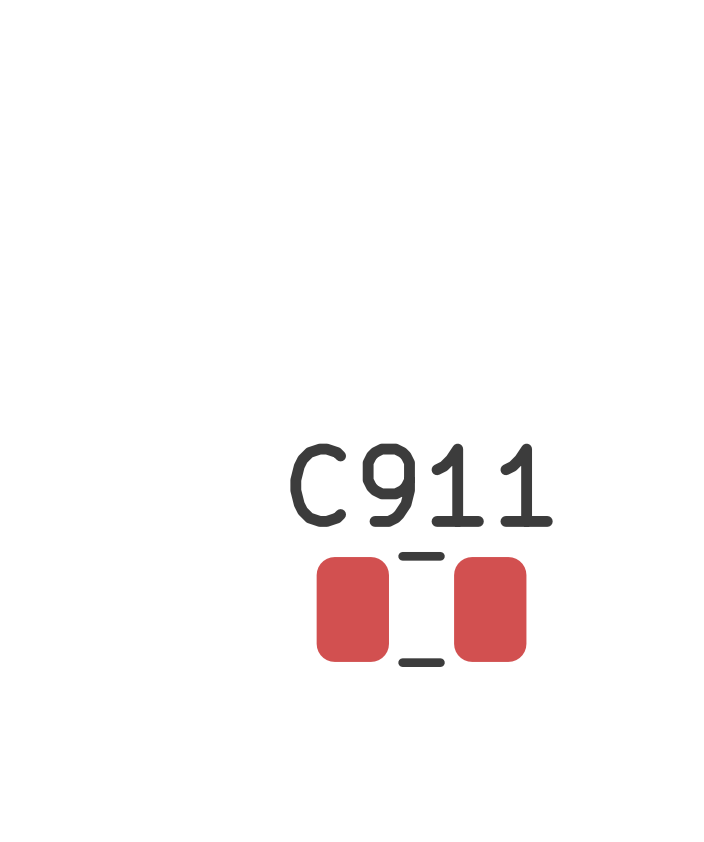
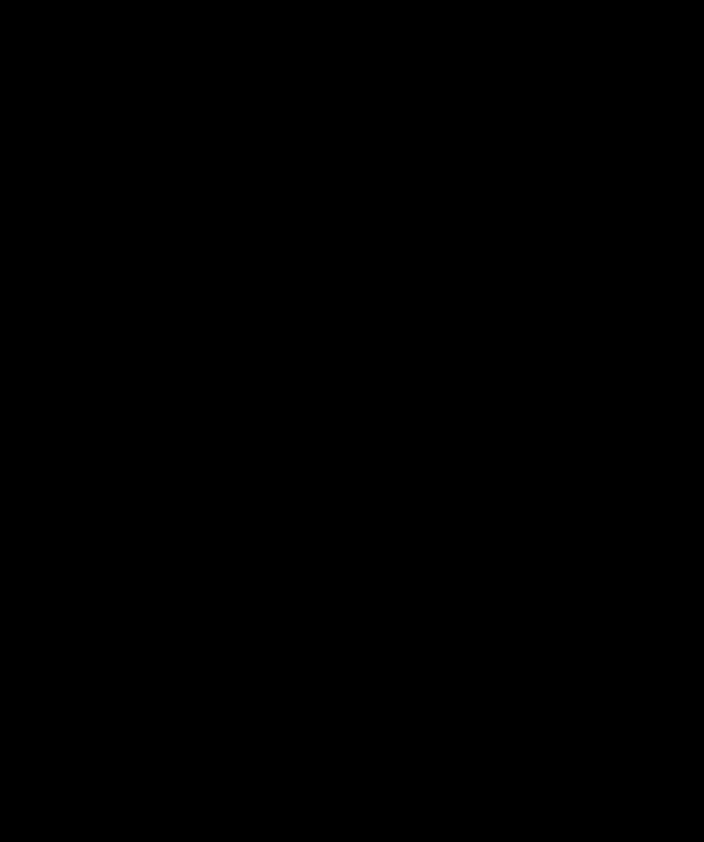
C911: (421, 609) -> none

